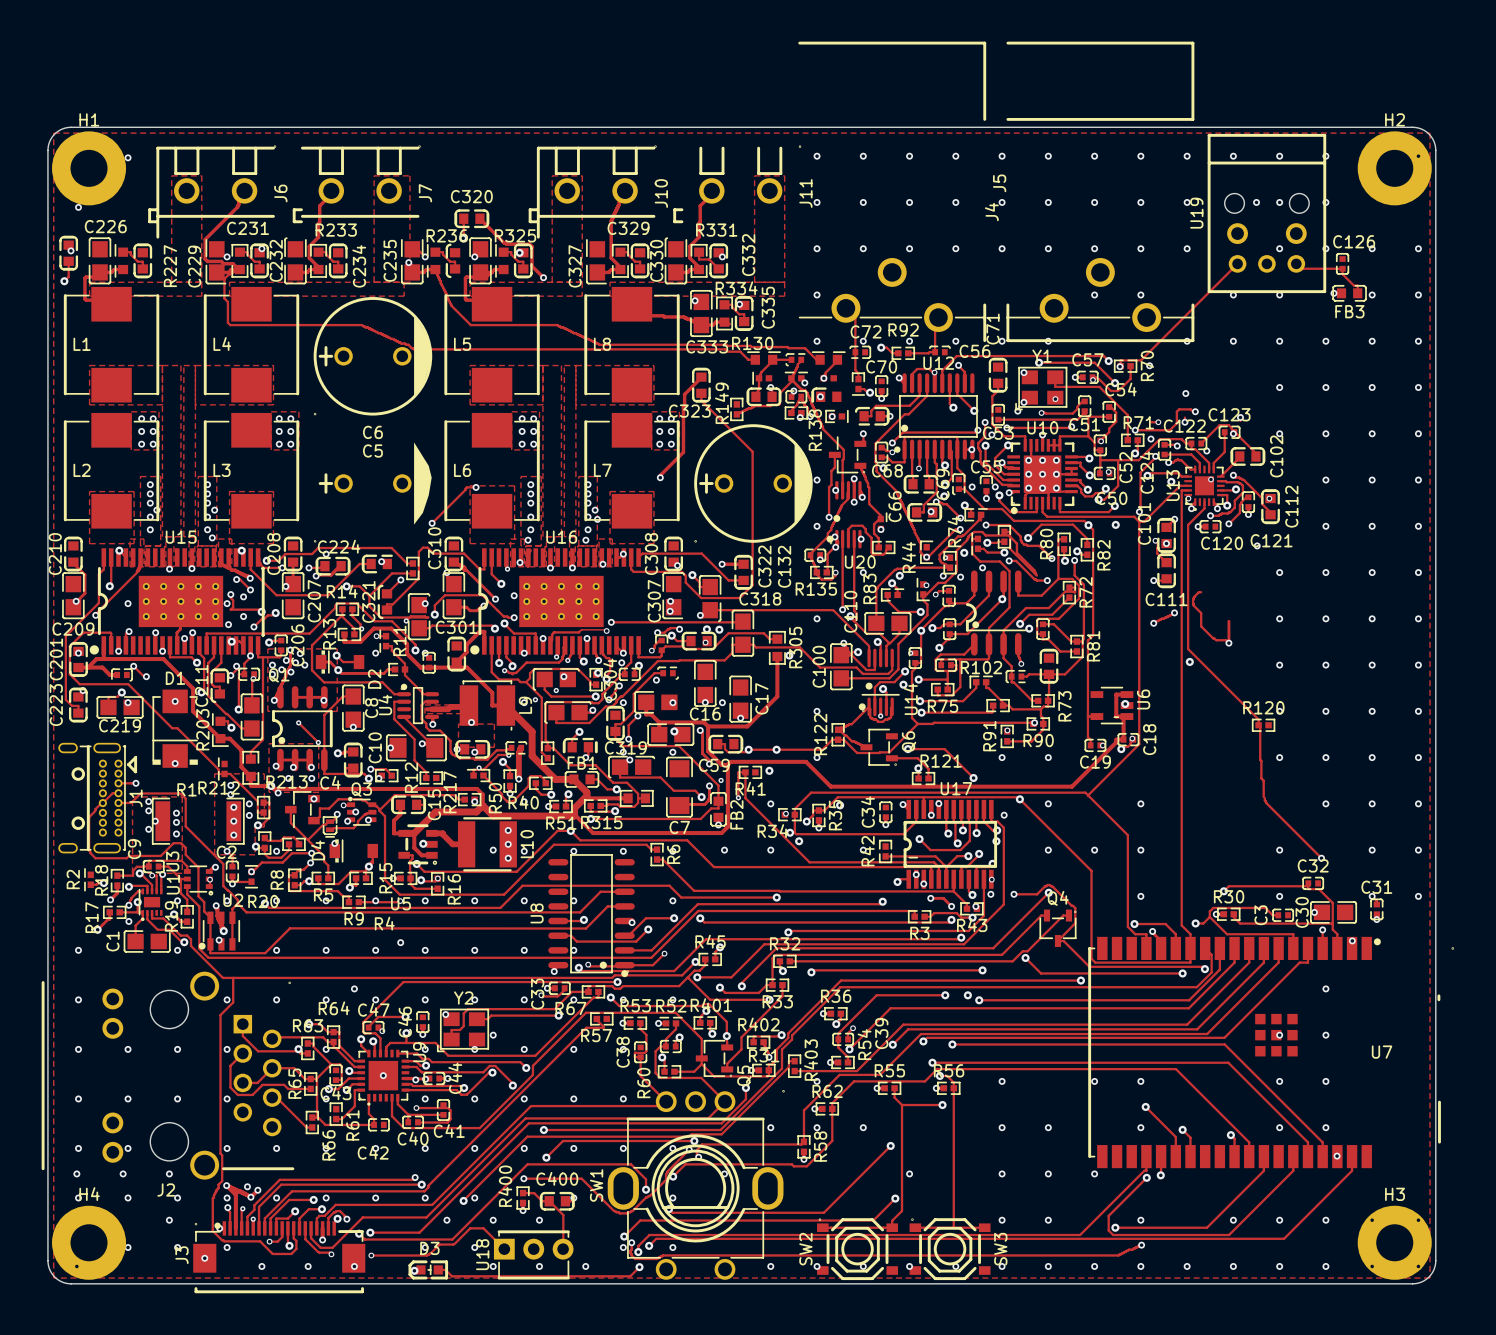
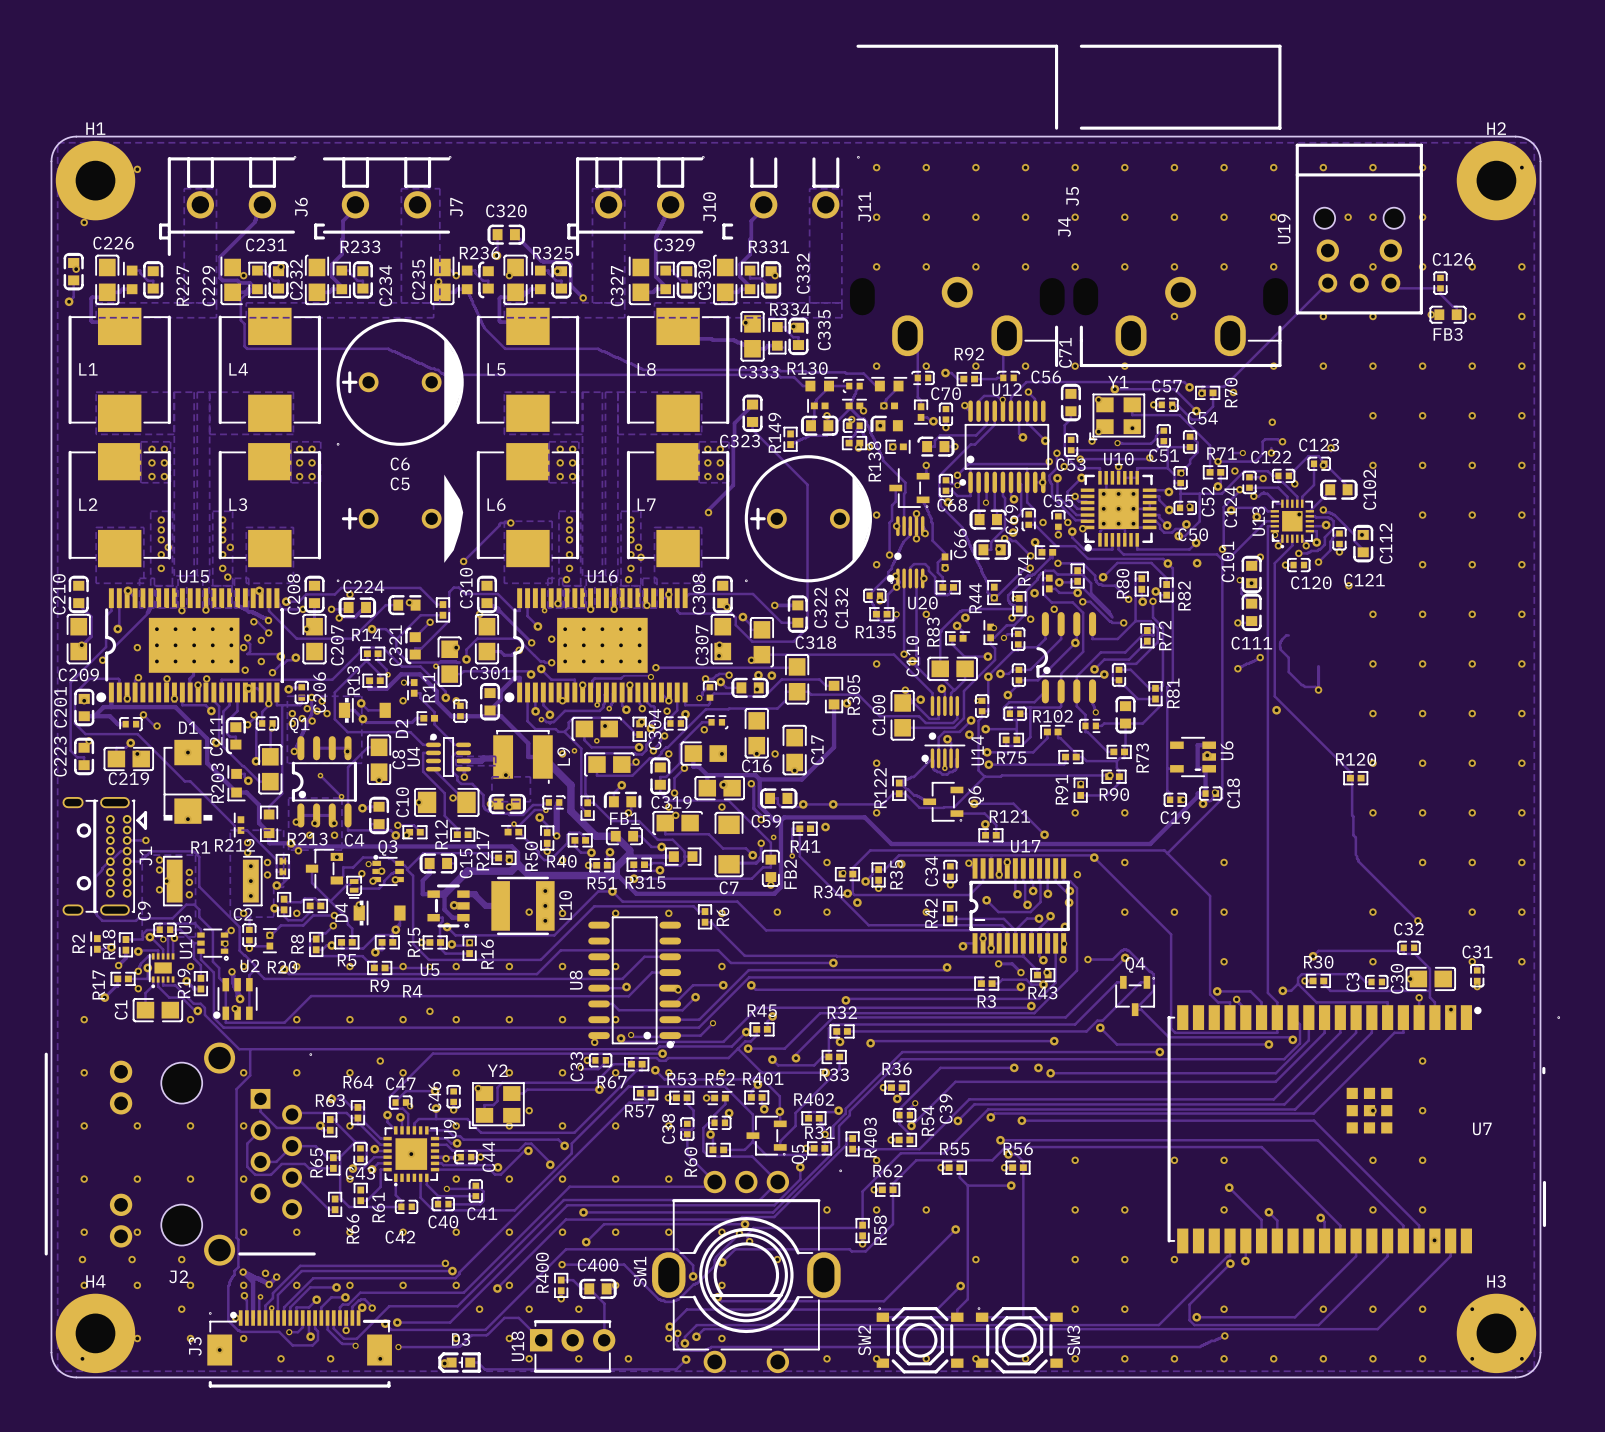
J4 footprint: [798, 41, 987, 343] -> [849, 44, 1065, 368]
J5 footprint: [1006, 41, 1195, 343] -> [1073, 44, 1288, 368]
via: (817, 294) -> none
via: (1140, 294) -> none
C72 name: C72 (866, 331) -> none

